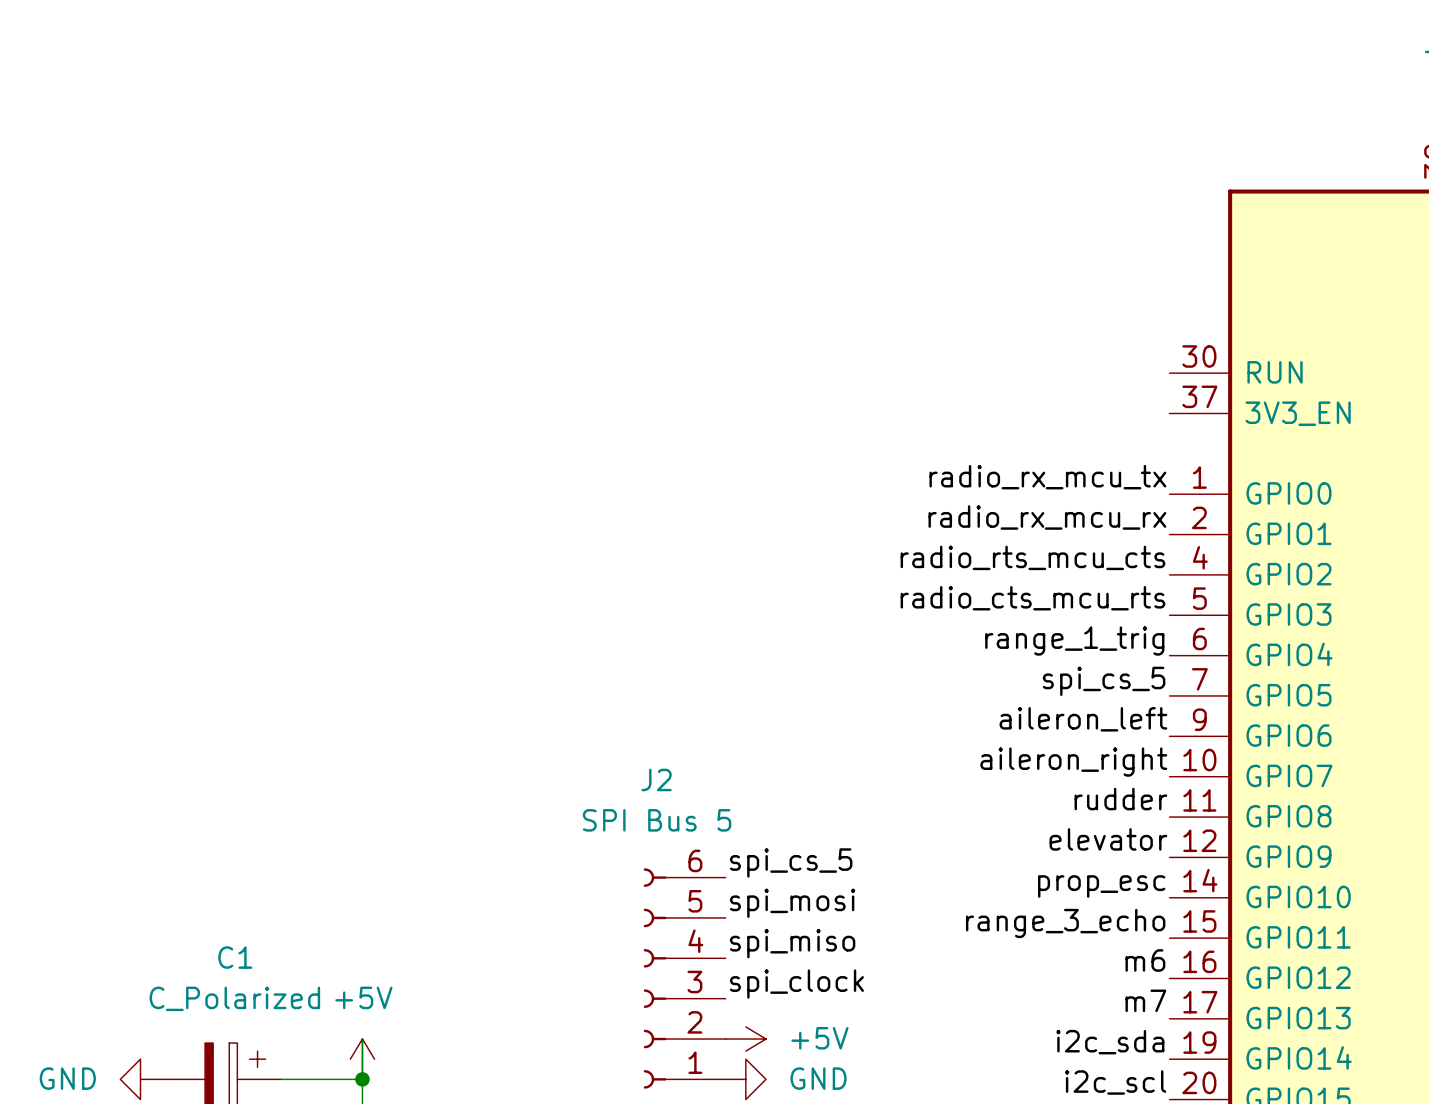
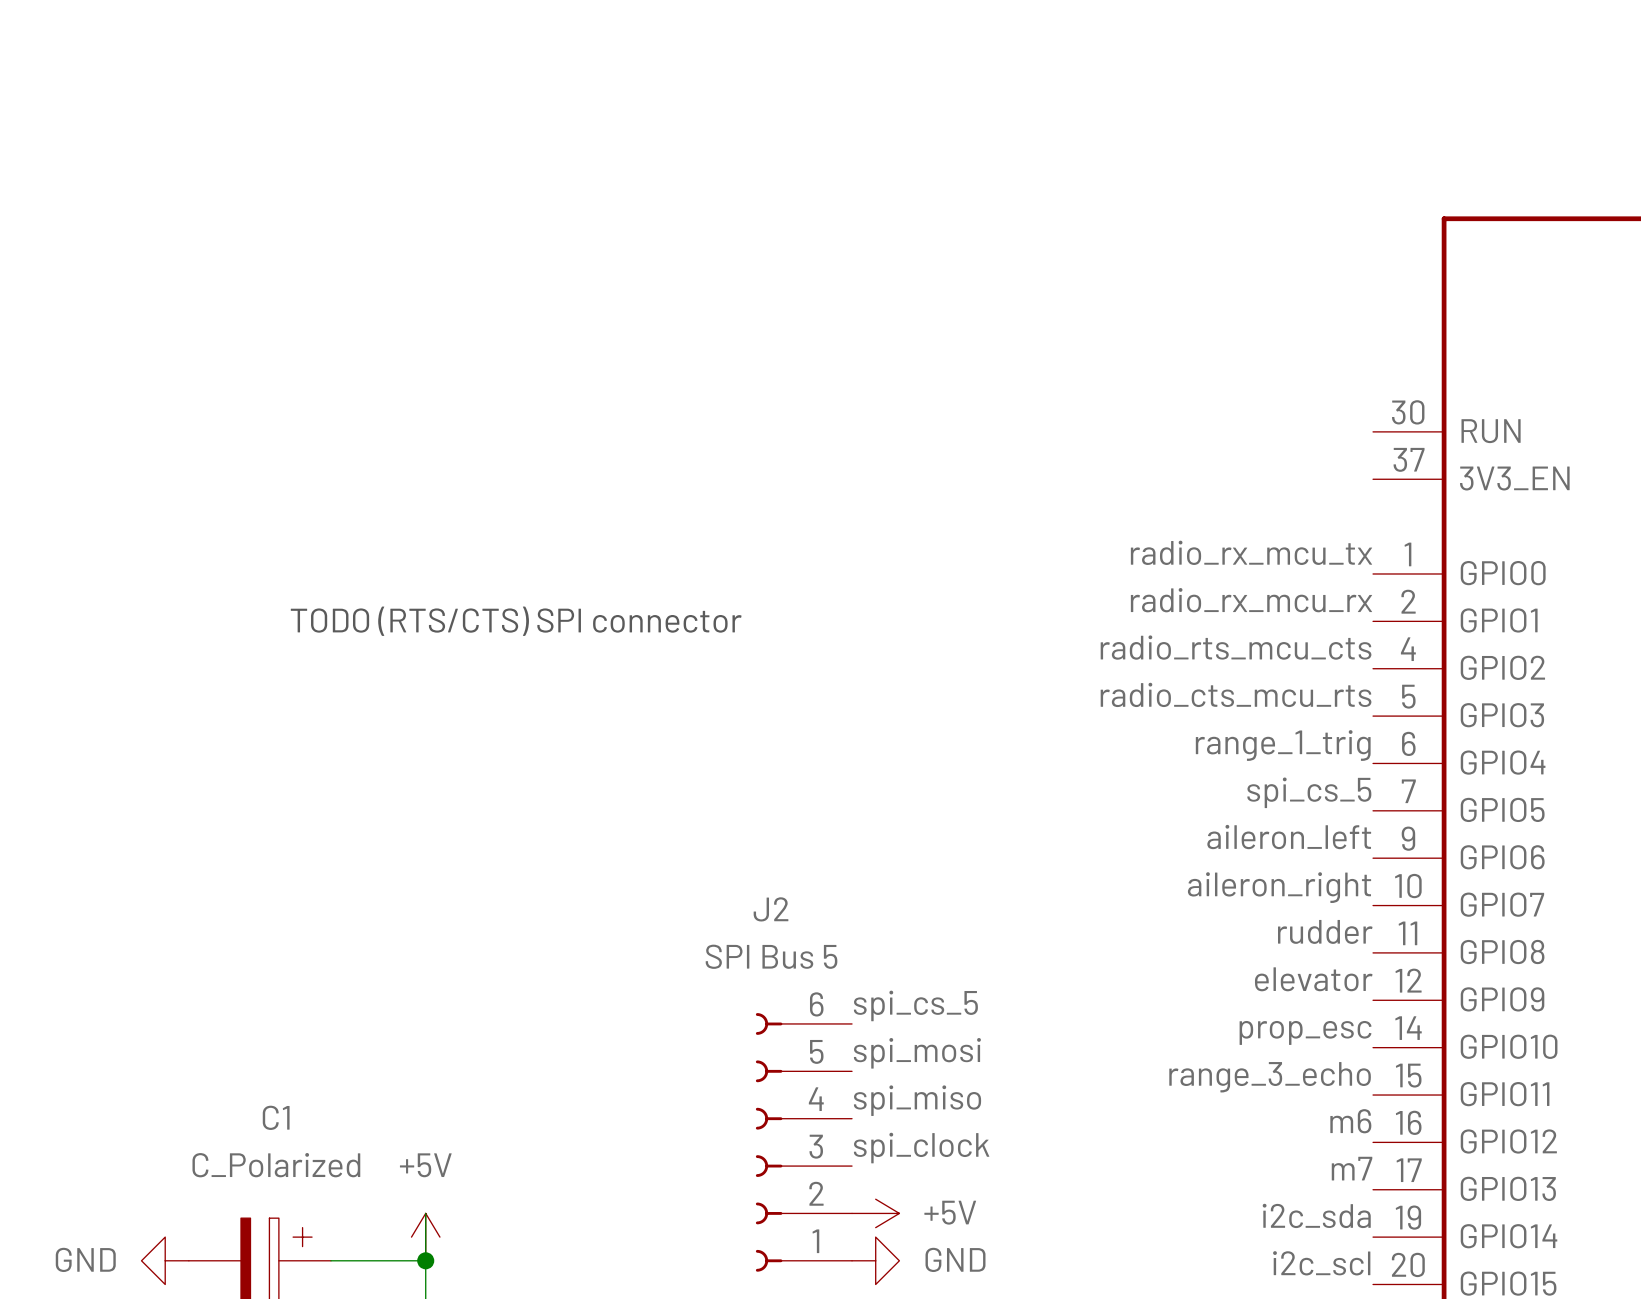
text: none -> TODO (RTS/CTS) SPI connector (516, 621)

